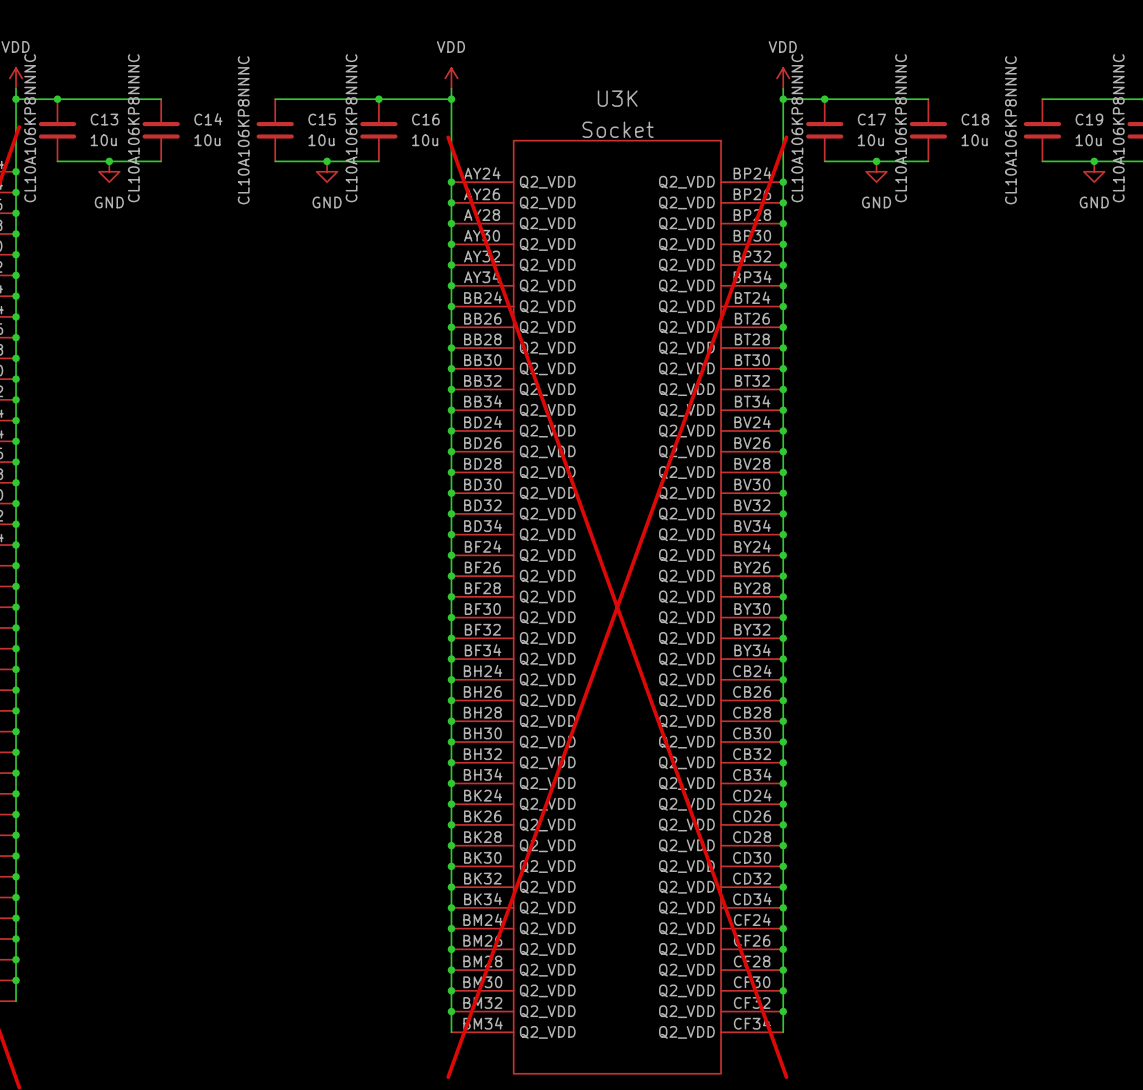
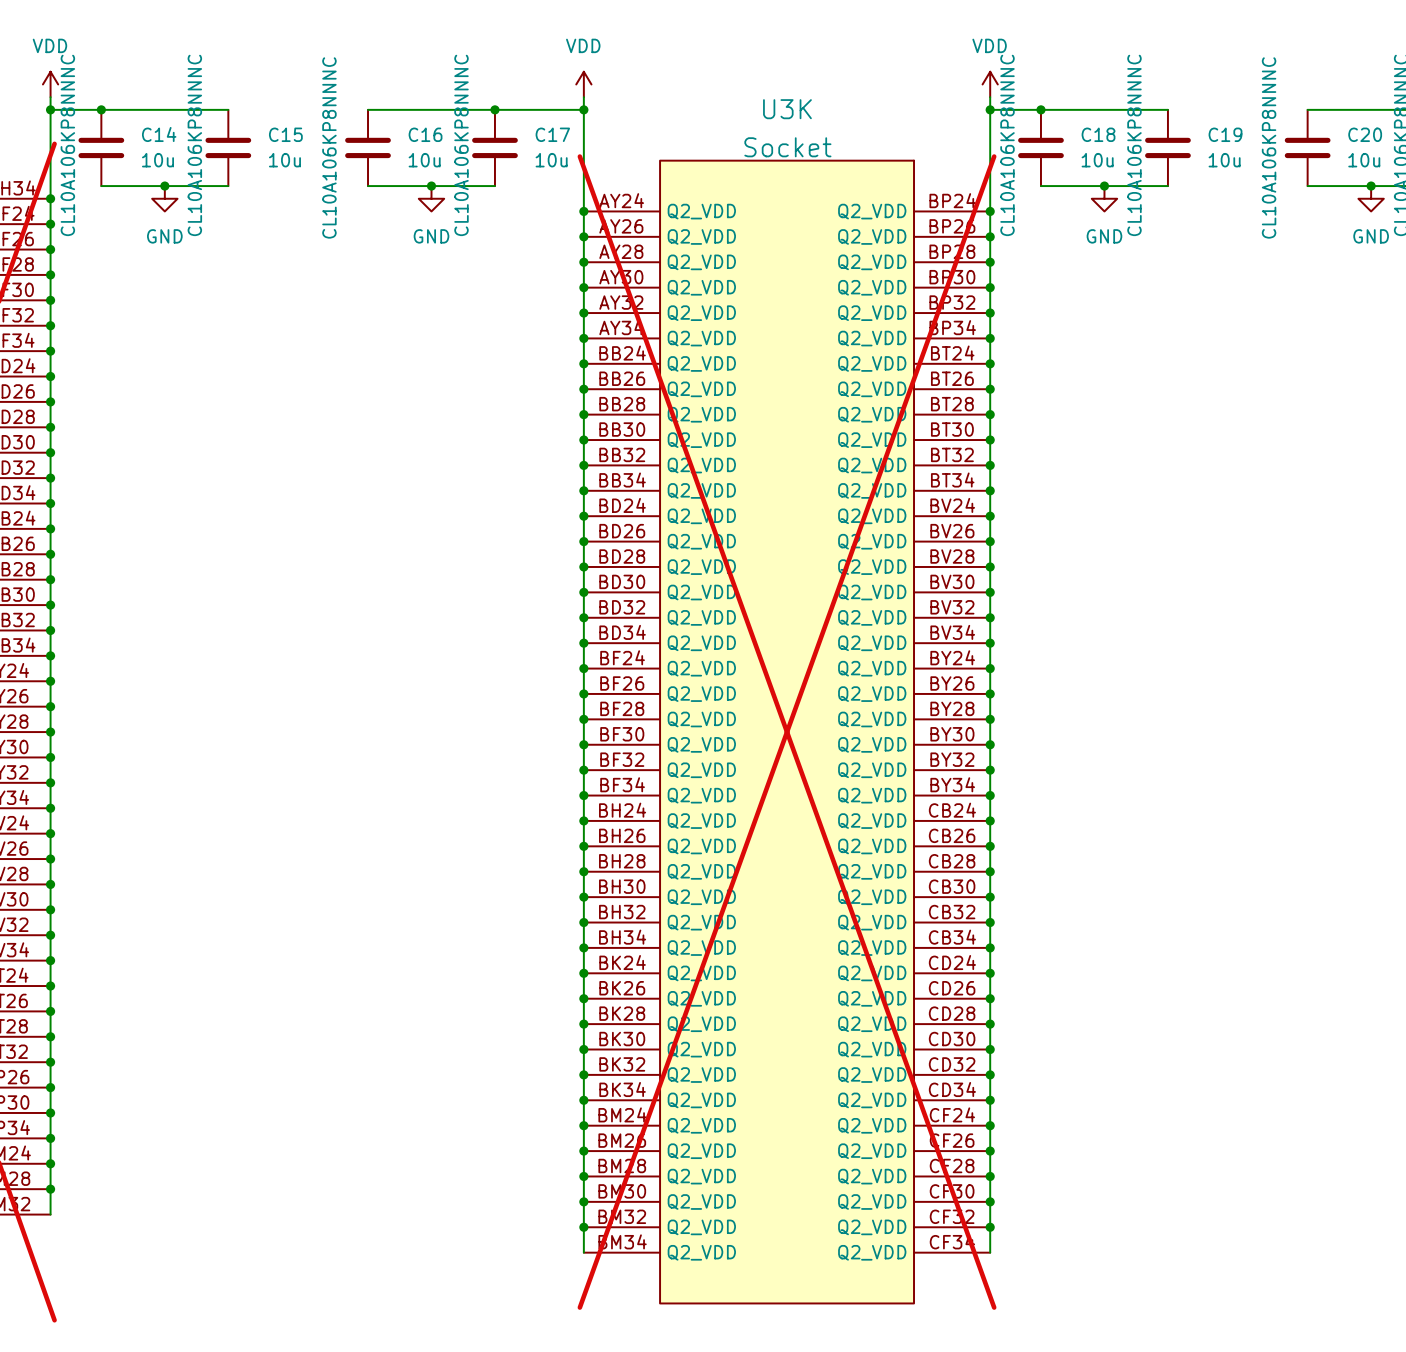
C13 name: C13 (104, 119) -> C14 (159, 134)
C14 name: C14 (208, 119) -> C15 (285, 134)
C15 name: C15 (322, 119) -> C16 (425, 134)
C16 name: C16 (425, 119) -> C17 (552, 134)
C17 name: C17 (871, 119) -> C18 (1098, 134)
C18 name: C18 (975, 119) -> C19 (1225, 134)
C19 name: C19 (1089, 119) -> C20 (1365, 134)

